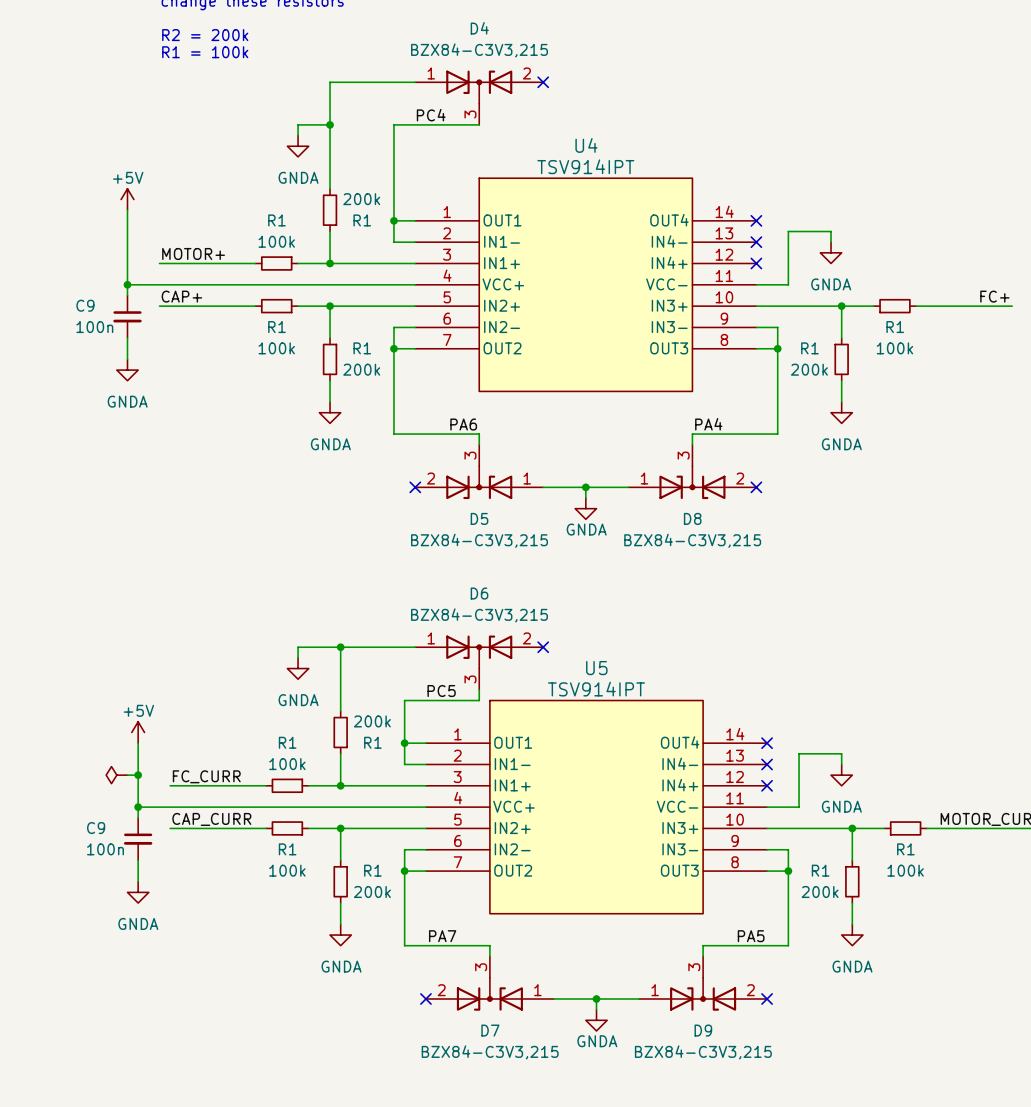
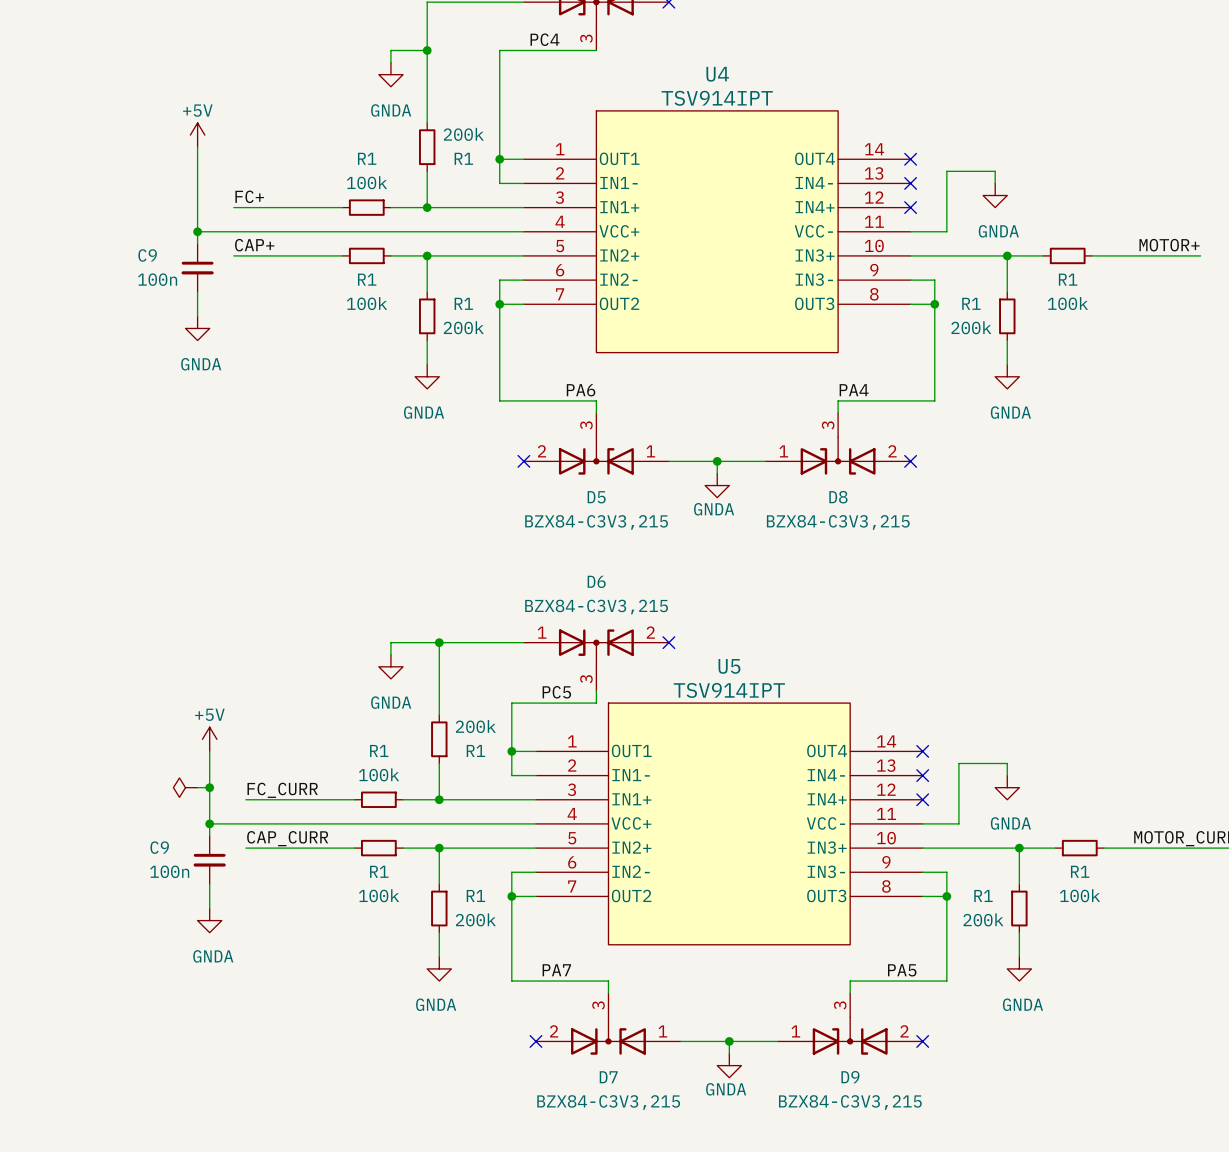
label: MOTOR+ (193, 253) -> FC+ (249, 196)
label: FC+ (994, 296) -> MOTOR+ (1169, 245)

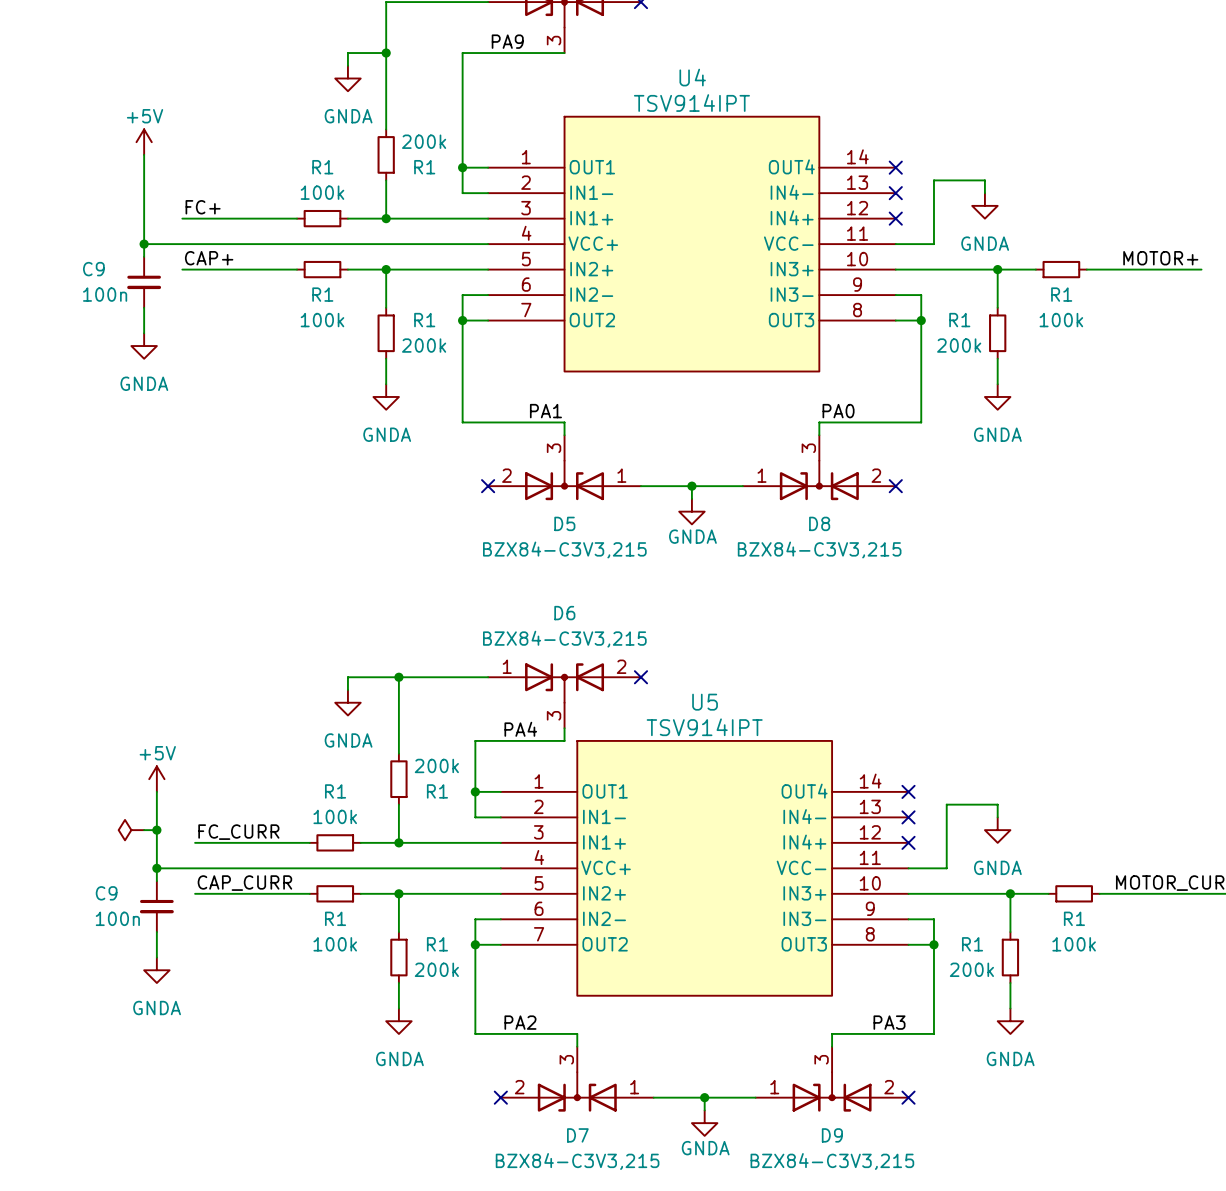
label: PC4 (545, 39) -> PA9 (507, 41)
label: PA6 (581, 390) -> PA1 (545, 411)
label: PA4 (854, 390) -> PA0 (838, 411)
label: PC5 (556, 692) -> PA4 (520, 729)
label: PA7 (556, 970) -> PA2 (520, 1022)
label: PA5 (902, 970) -> PA3 (889, 1022)

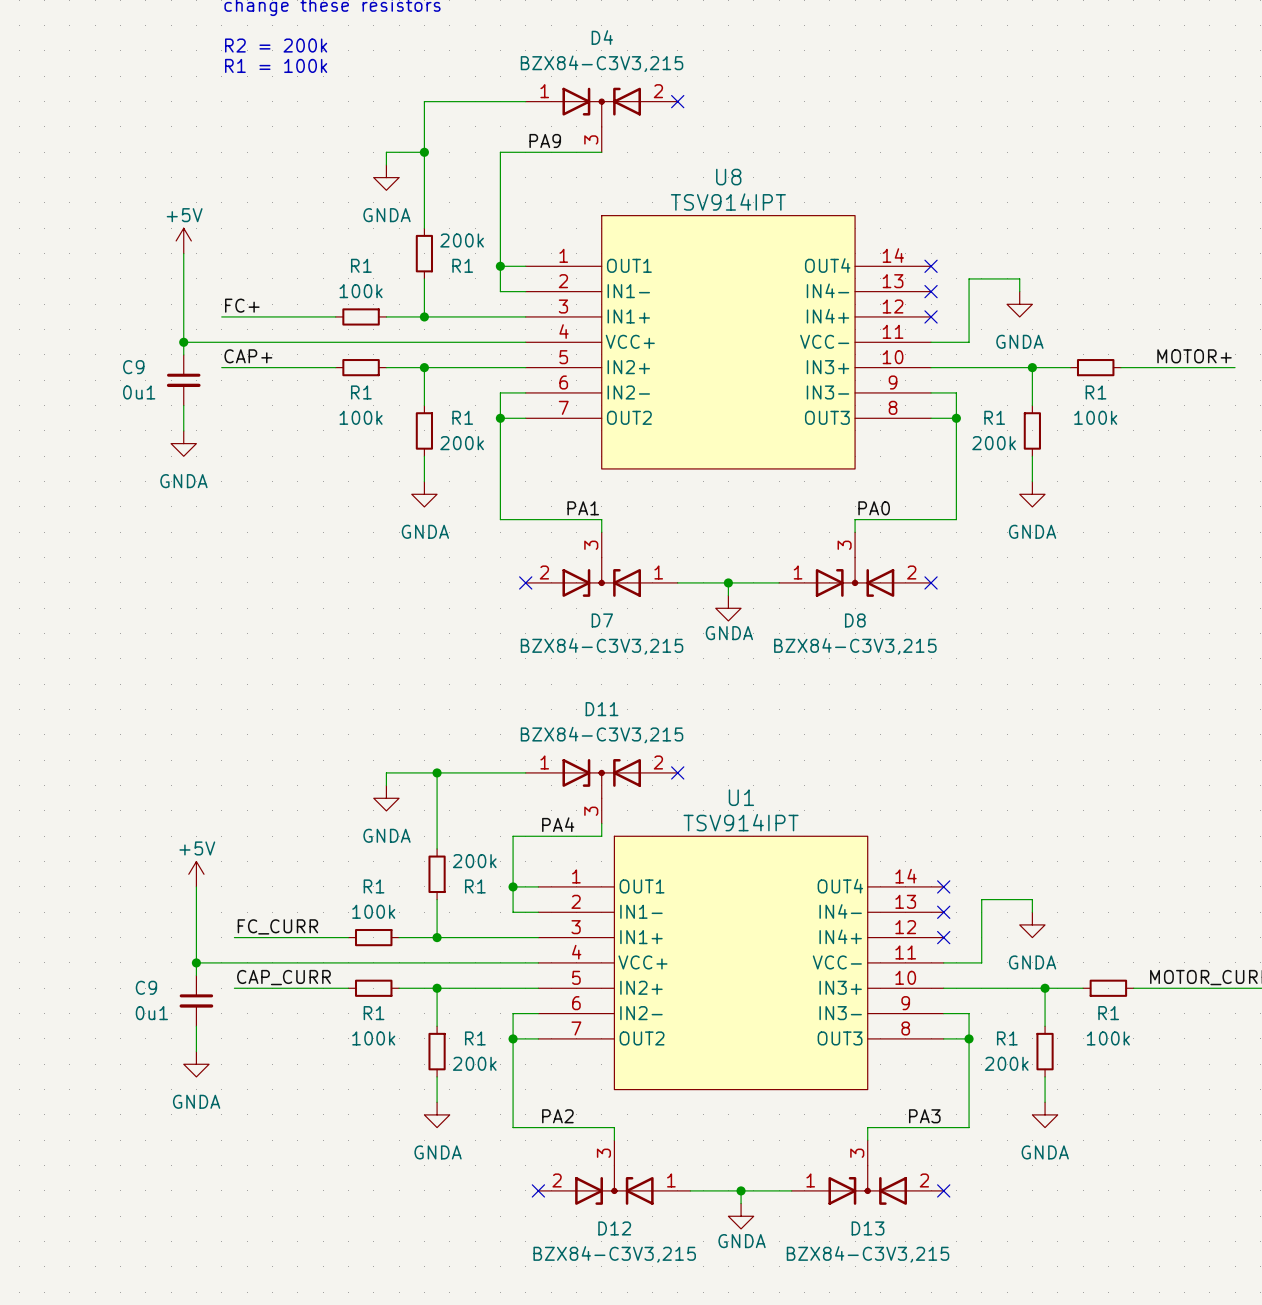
U4 name: U4 (692, 77) -> U8 (728, 177)
C9 value: 100n (105, 294) -> 0u1 (139, 392)
D5 name: D5 (564, 523) -> D7 (602, 620)
D6 name: D6 (564, 613) -> D11 (602, 709)
U5 name: U5 (705, 702) -> U1 (741, 797)
power symbol: (131, 830) -> none
wire: (144, 830) (156, 830) -> none
junction: (156, 830) -> none
C9 value: 100n (117, 918) -> 0u1 (151, 1013)
D7 name: D7 (577, 1135) -> D12 (614, 1228)
D9 name: D9 (832, 1135) -> D13 (868, 1228)

